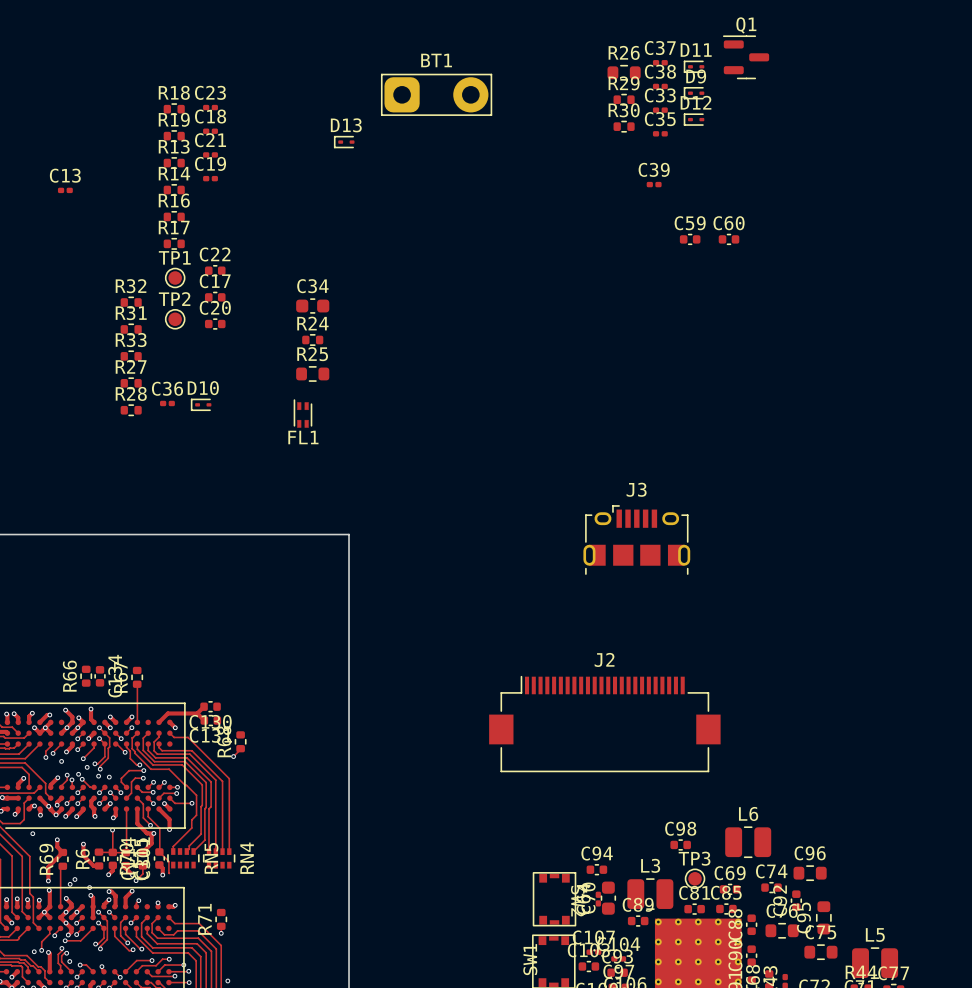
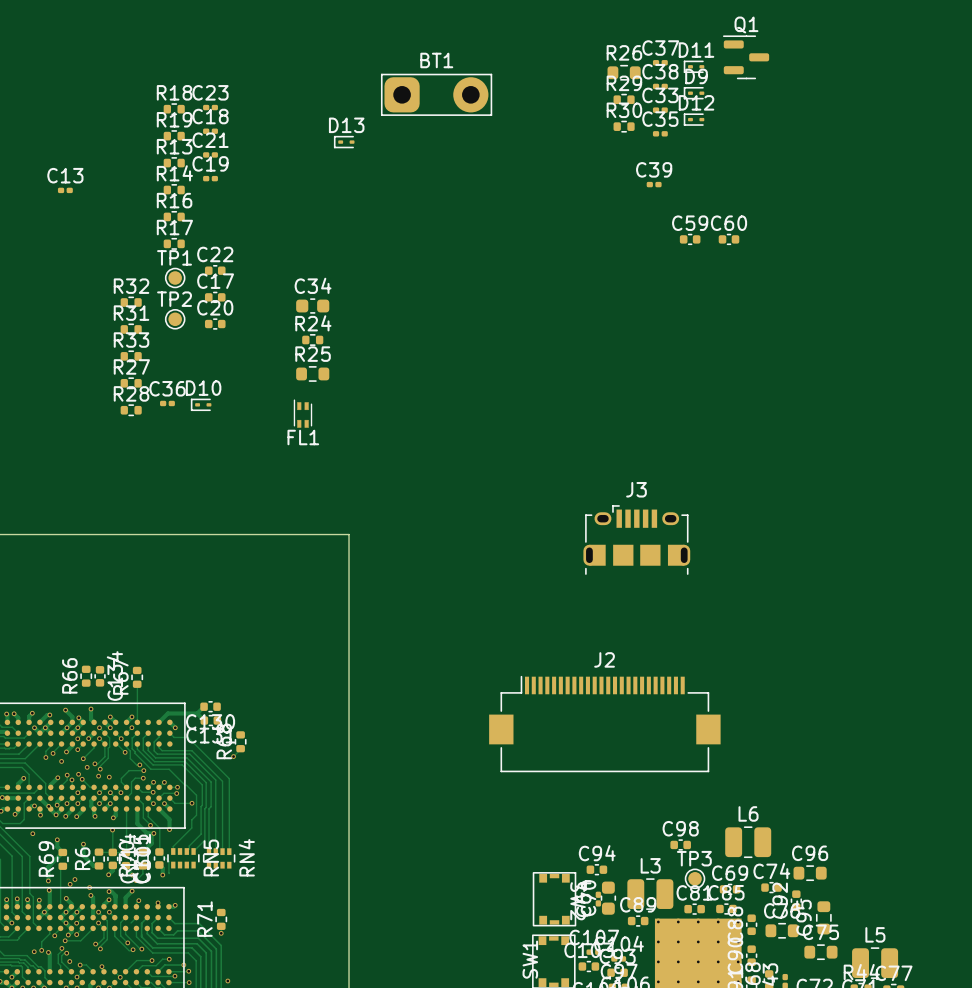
via: (131, 922) -> none

